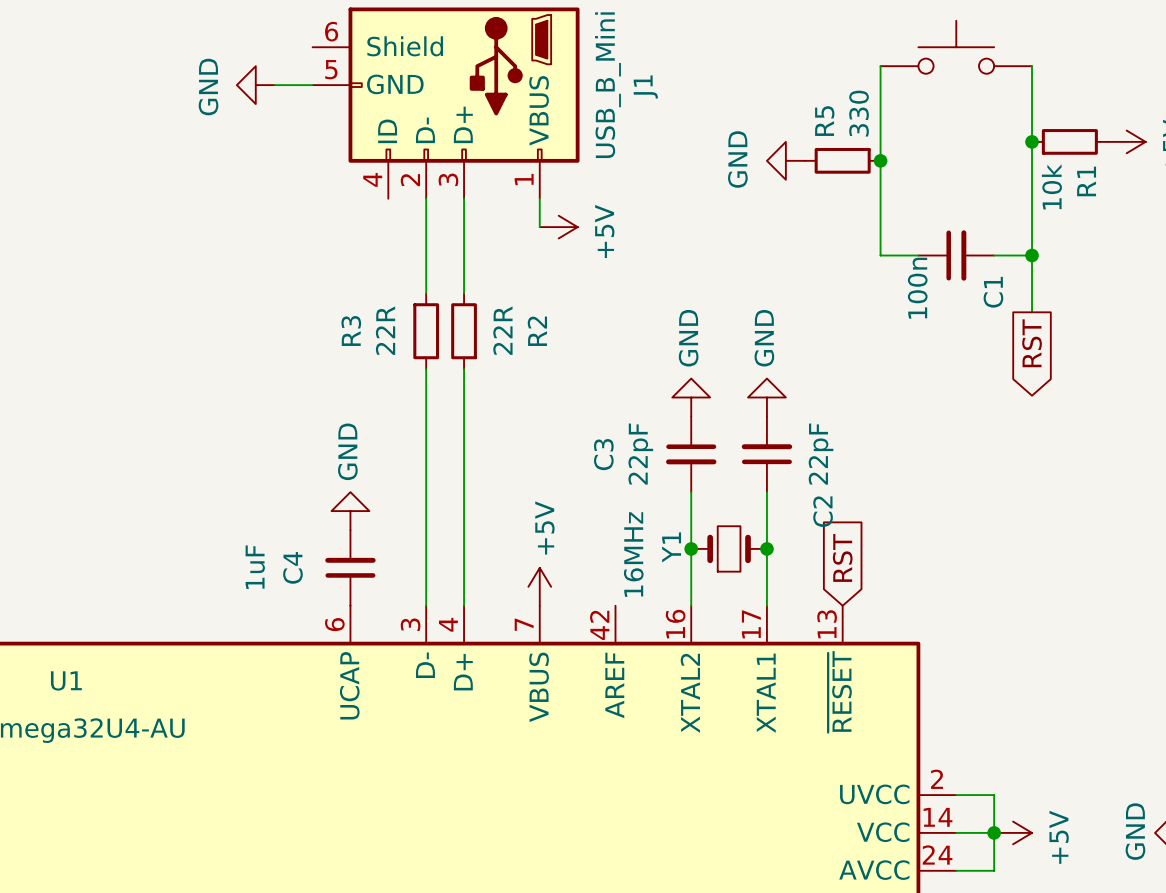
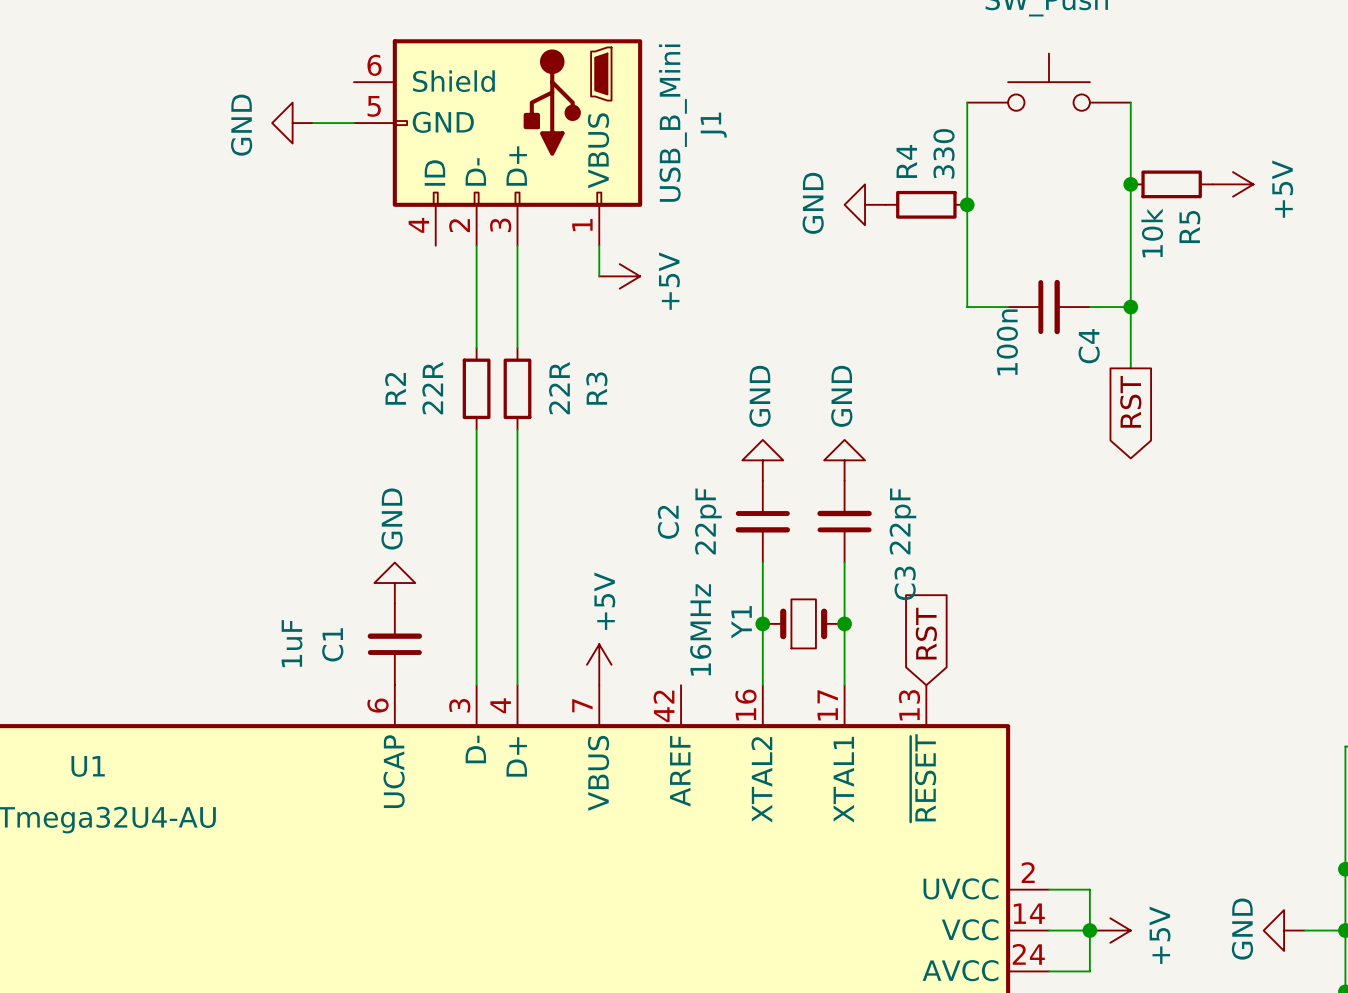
R5 name: R5 (824, 121) -> R4 (906, 161)
R1 name: R1 (1086, 181) -> R5 (1189, 227)
C1 name: C1 (993, 292) -> C4 (1089, 346)
R3 name: R3 (351, 331) -> R2 (395, 388)
R2 name: R2 (537, 331) -> R3 (596, 388)
C3 name: C3 (603, 454) -> C2 (668, 522)
C2 name: C2 (823, 511) -> C3 (905, 583)
C4 name: C4 (292, 567) -> C1 (332, 644)

